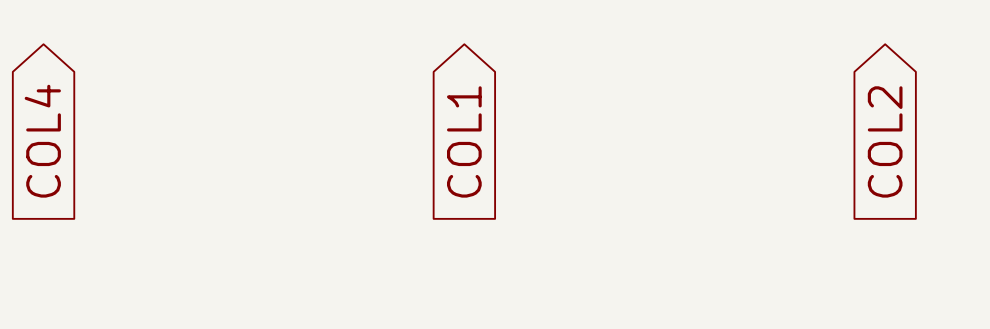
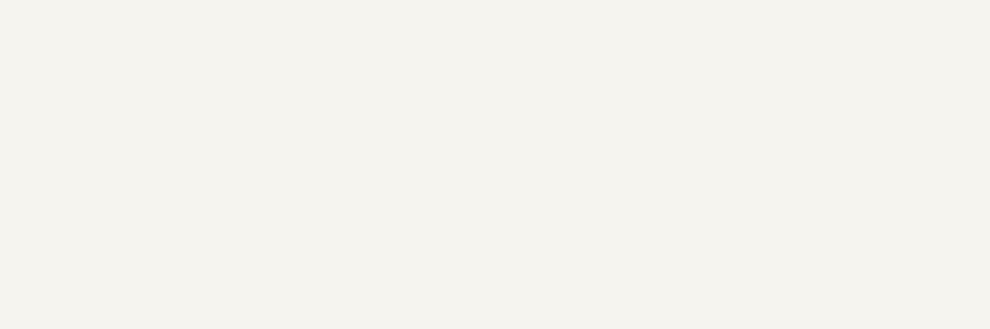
global label: COL4 (42, 141) -> none
global label: COL1 (464, 141) -> none
global label: COL2 (885, 141) -> none

